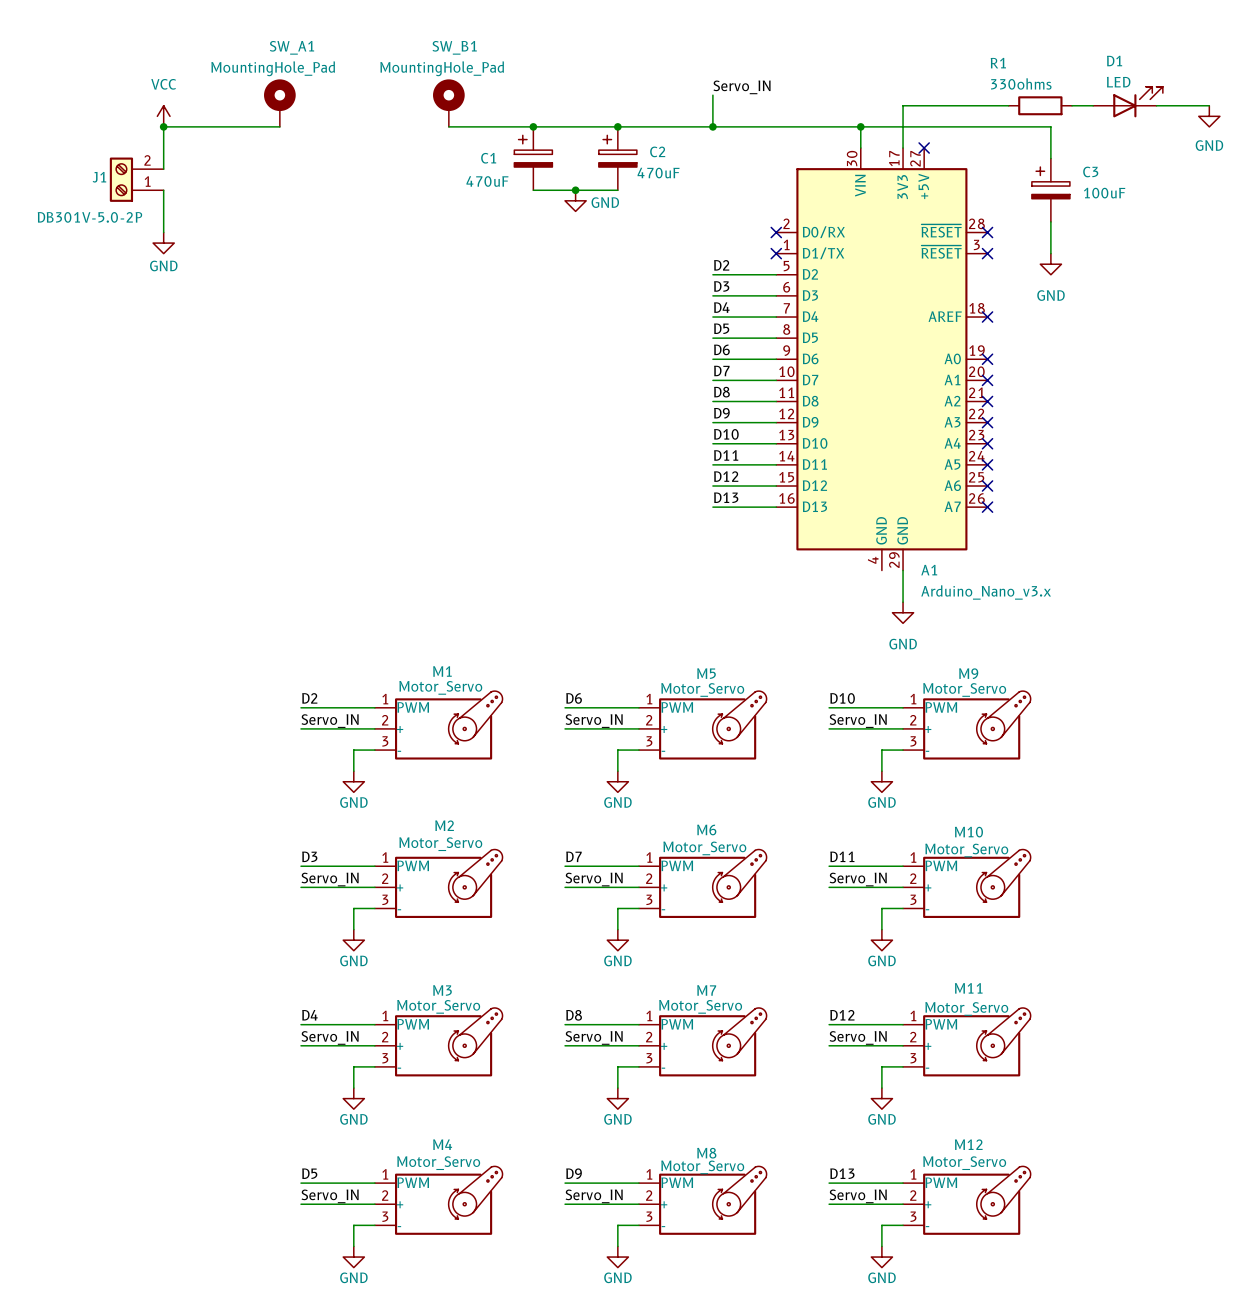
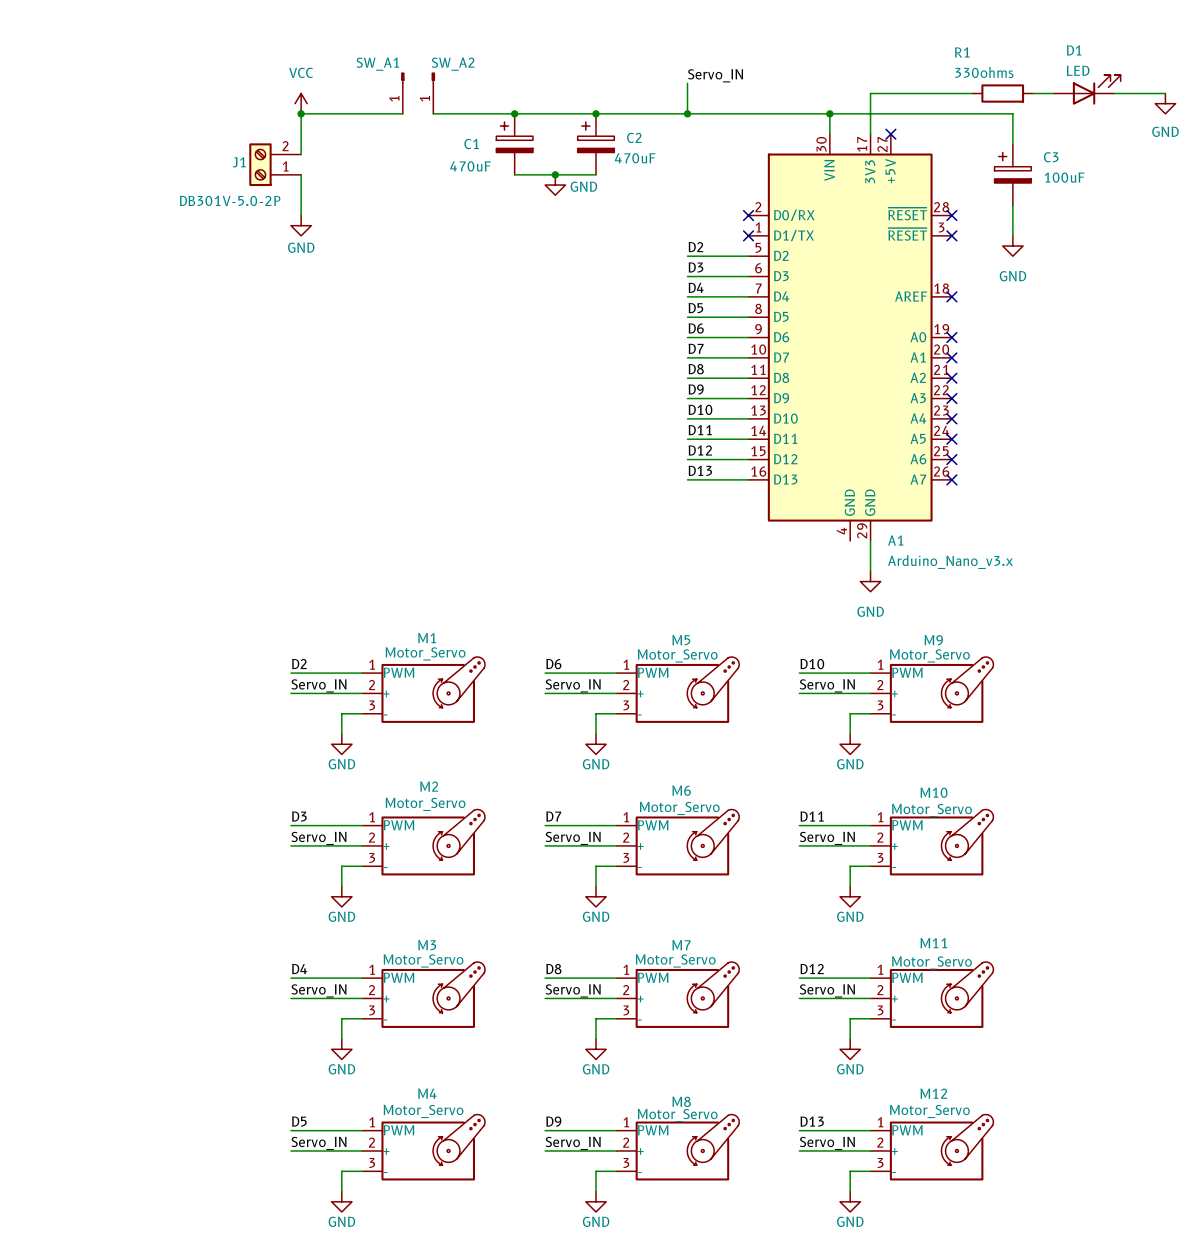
SW_A1 name position: SW_A1 (291, 47) -> SW_A1 (377, 64)
SW_A1 value: MountingHole_Pad (273, 68) -> none
SW_A1 symbol: [264, 79, 296, 127] -> [401, 72, 405, 114]
SW_B1: MountingHole_Pad (448, 103) -> none
SW_A2: none -> (433, 93)
power symbol position: VCC (163, 116) -> VCC (301, 103)
junction: (163, 126) -> none
wire: (279, 126) (163, 126) (163, 169) -> none
junction: none -> (301, 113)
wire: none -> (402, 113) (301, 113) (301, 154)
J1 position: (136, 179) -> (275, 164)
wire: (163, 190) (163, 232) -> (301, 174) (301, 215)
power symbol position: GND (163, 243) -> GND (301, 225)

